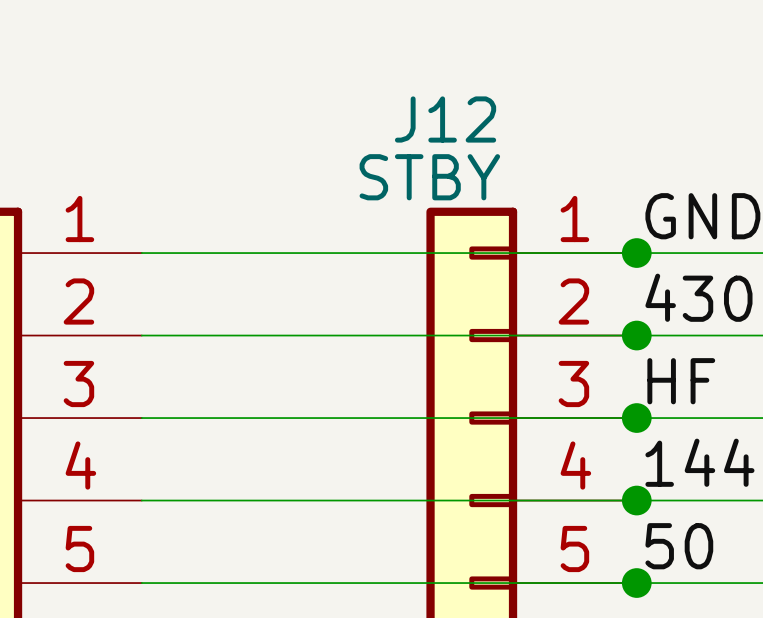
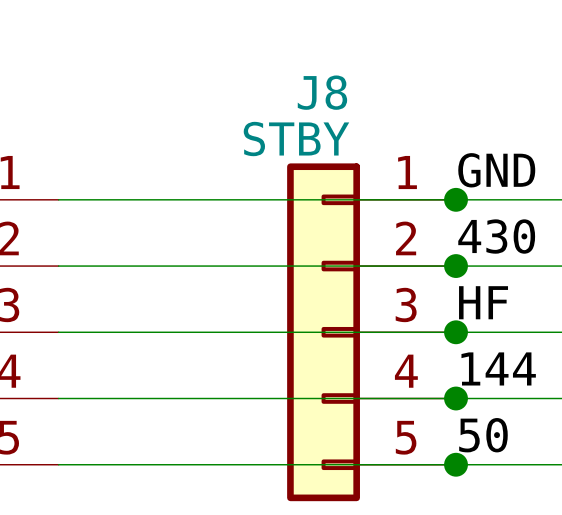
J12 name: J12 (445, 119) -> J8 (322, 92)

